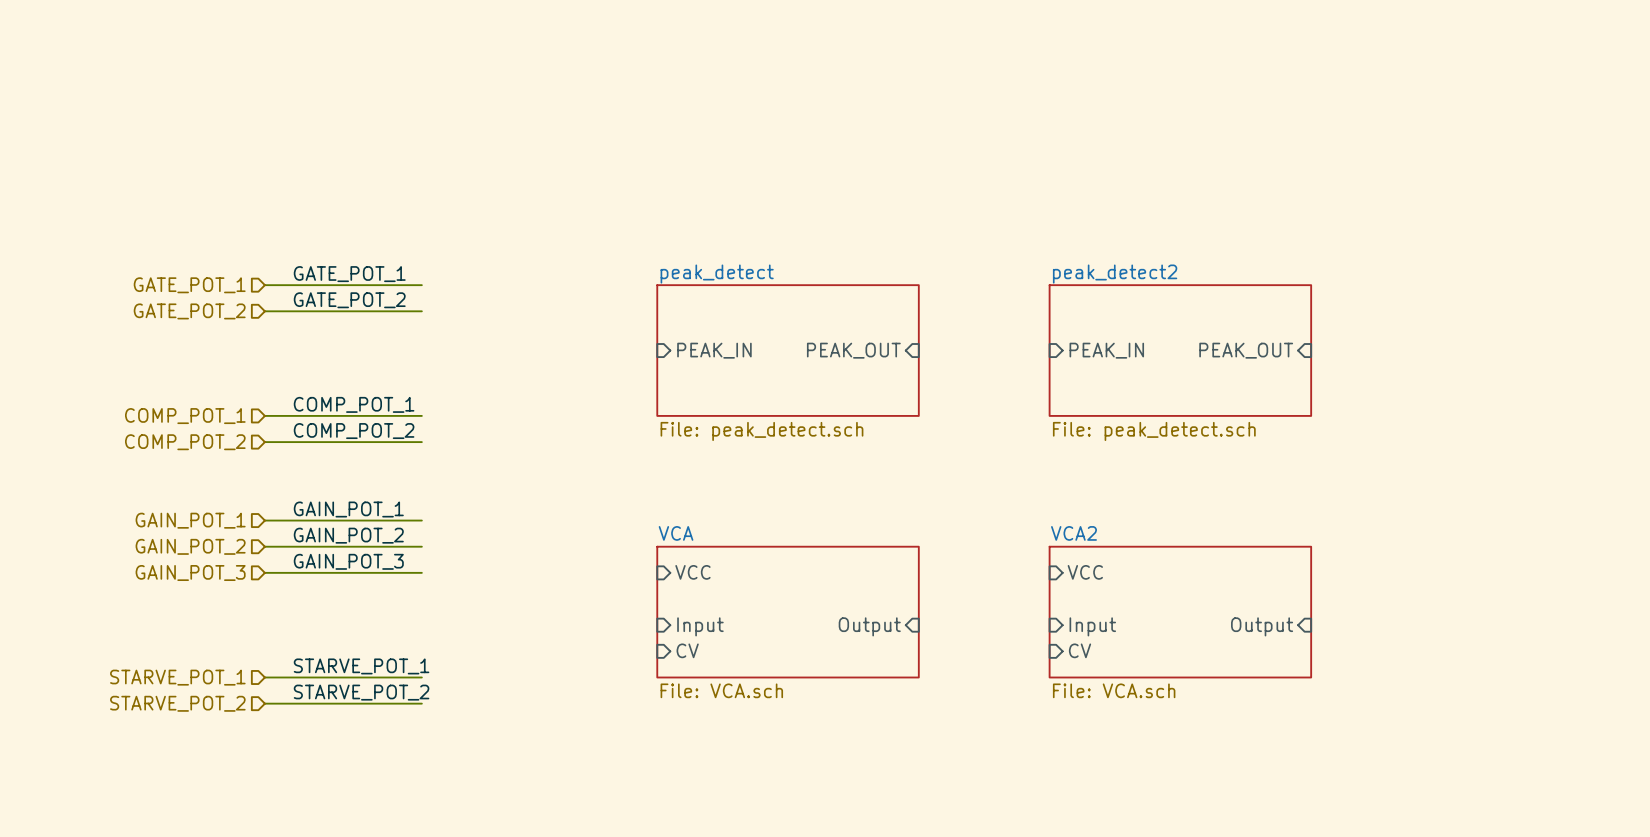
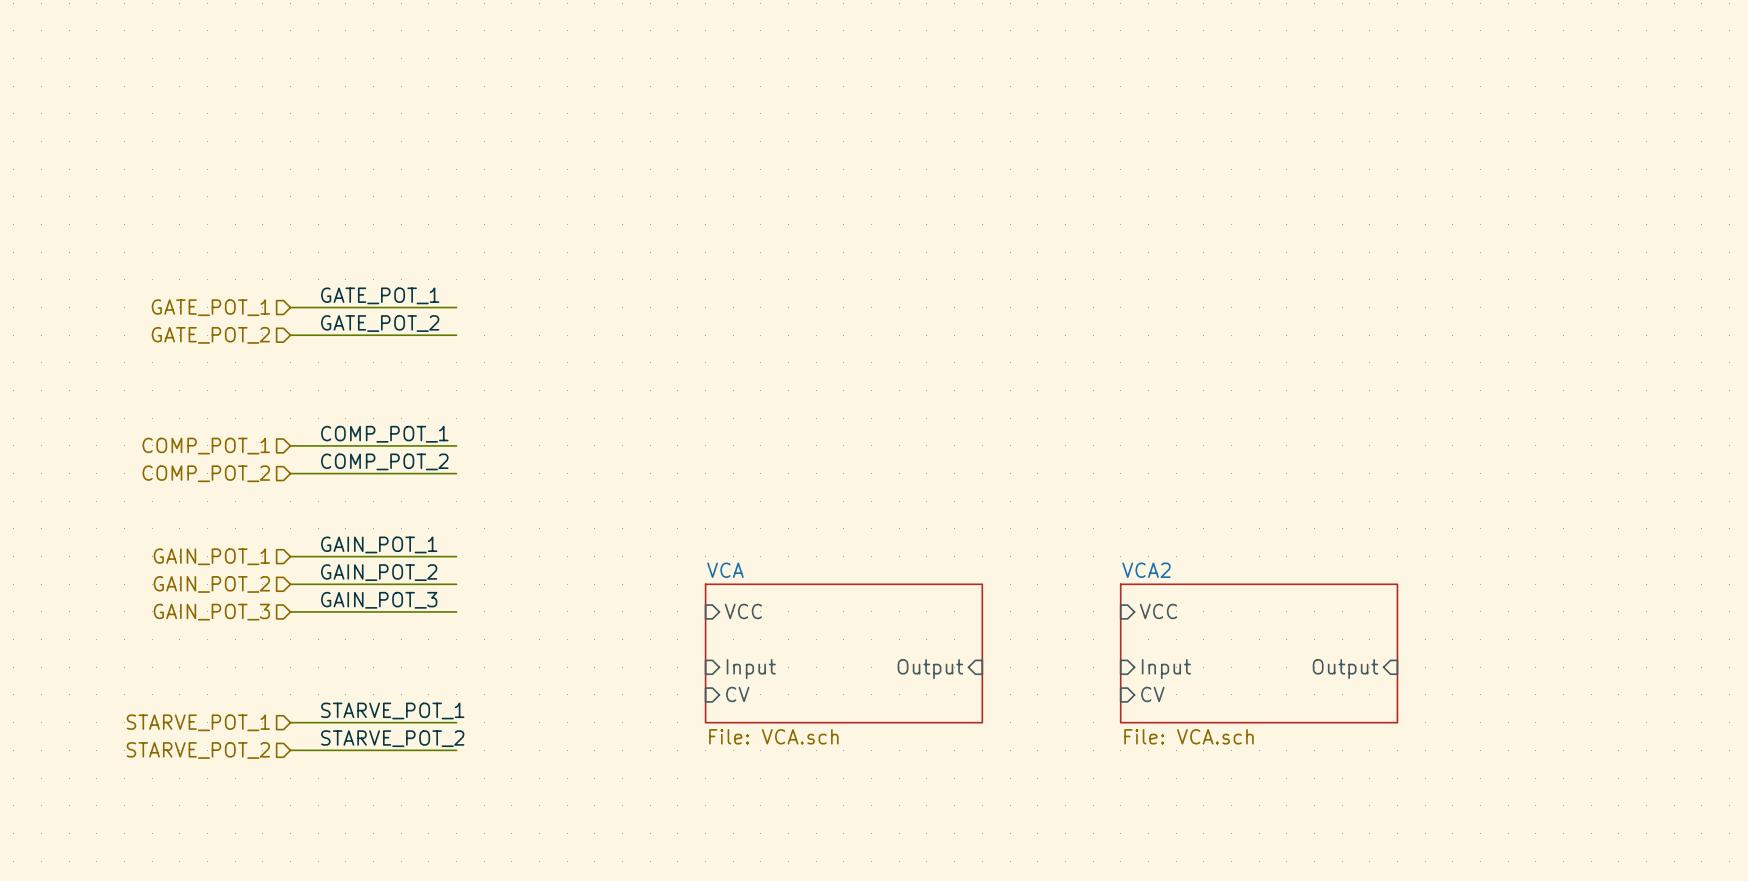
sheet pin: PEAK_IN (714, 350) -> none
sheet peak_detect: File: peak_detect.sch (788, 350) -> none
sheet pin: PEAK_OUT (853, 350) -> none
sheet pin: PEAK_IN (1106, 350) -> none
sheet peak_detect2: File: peak_detect.sch (1180, 350) -> none
sheet pin: PEAK_OUT (1246, 350) -> none

